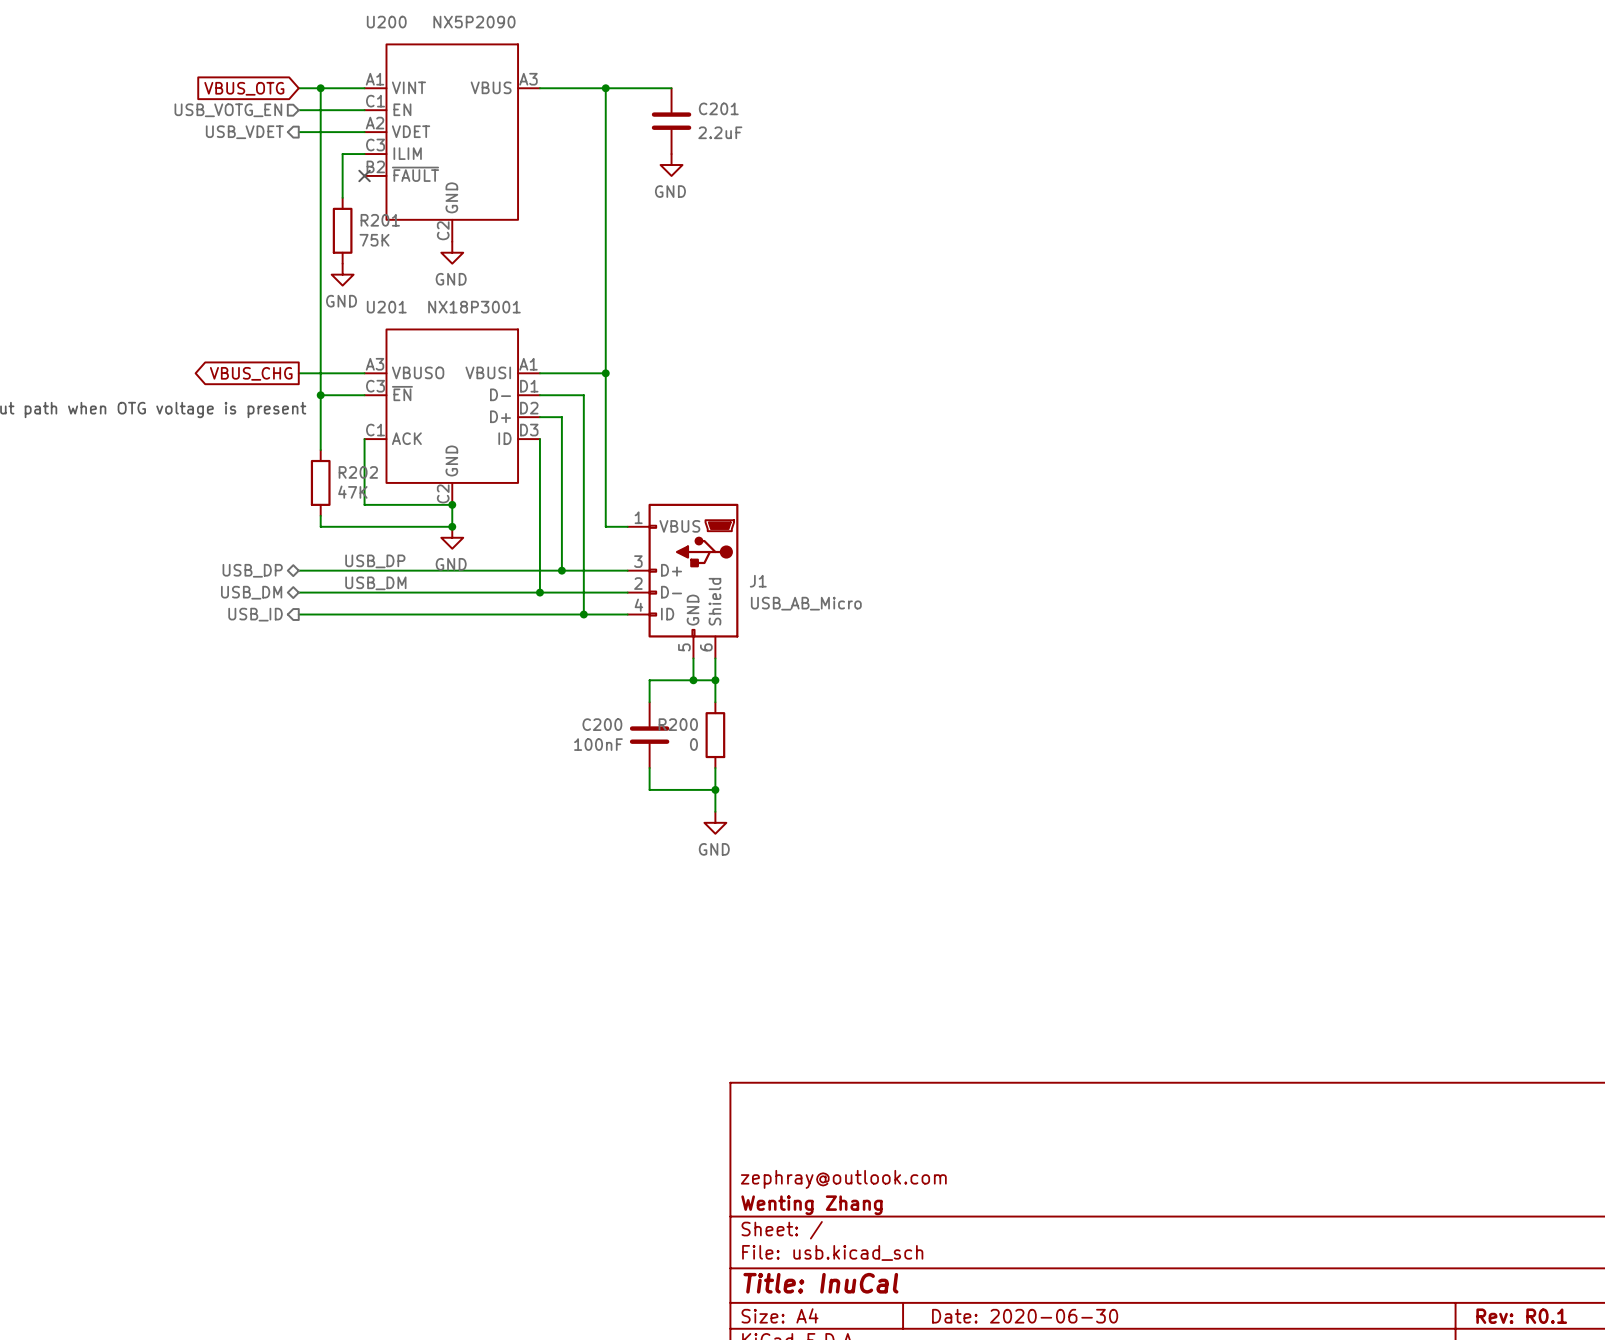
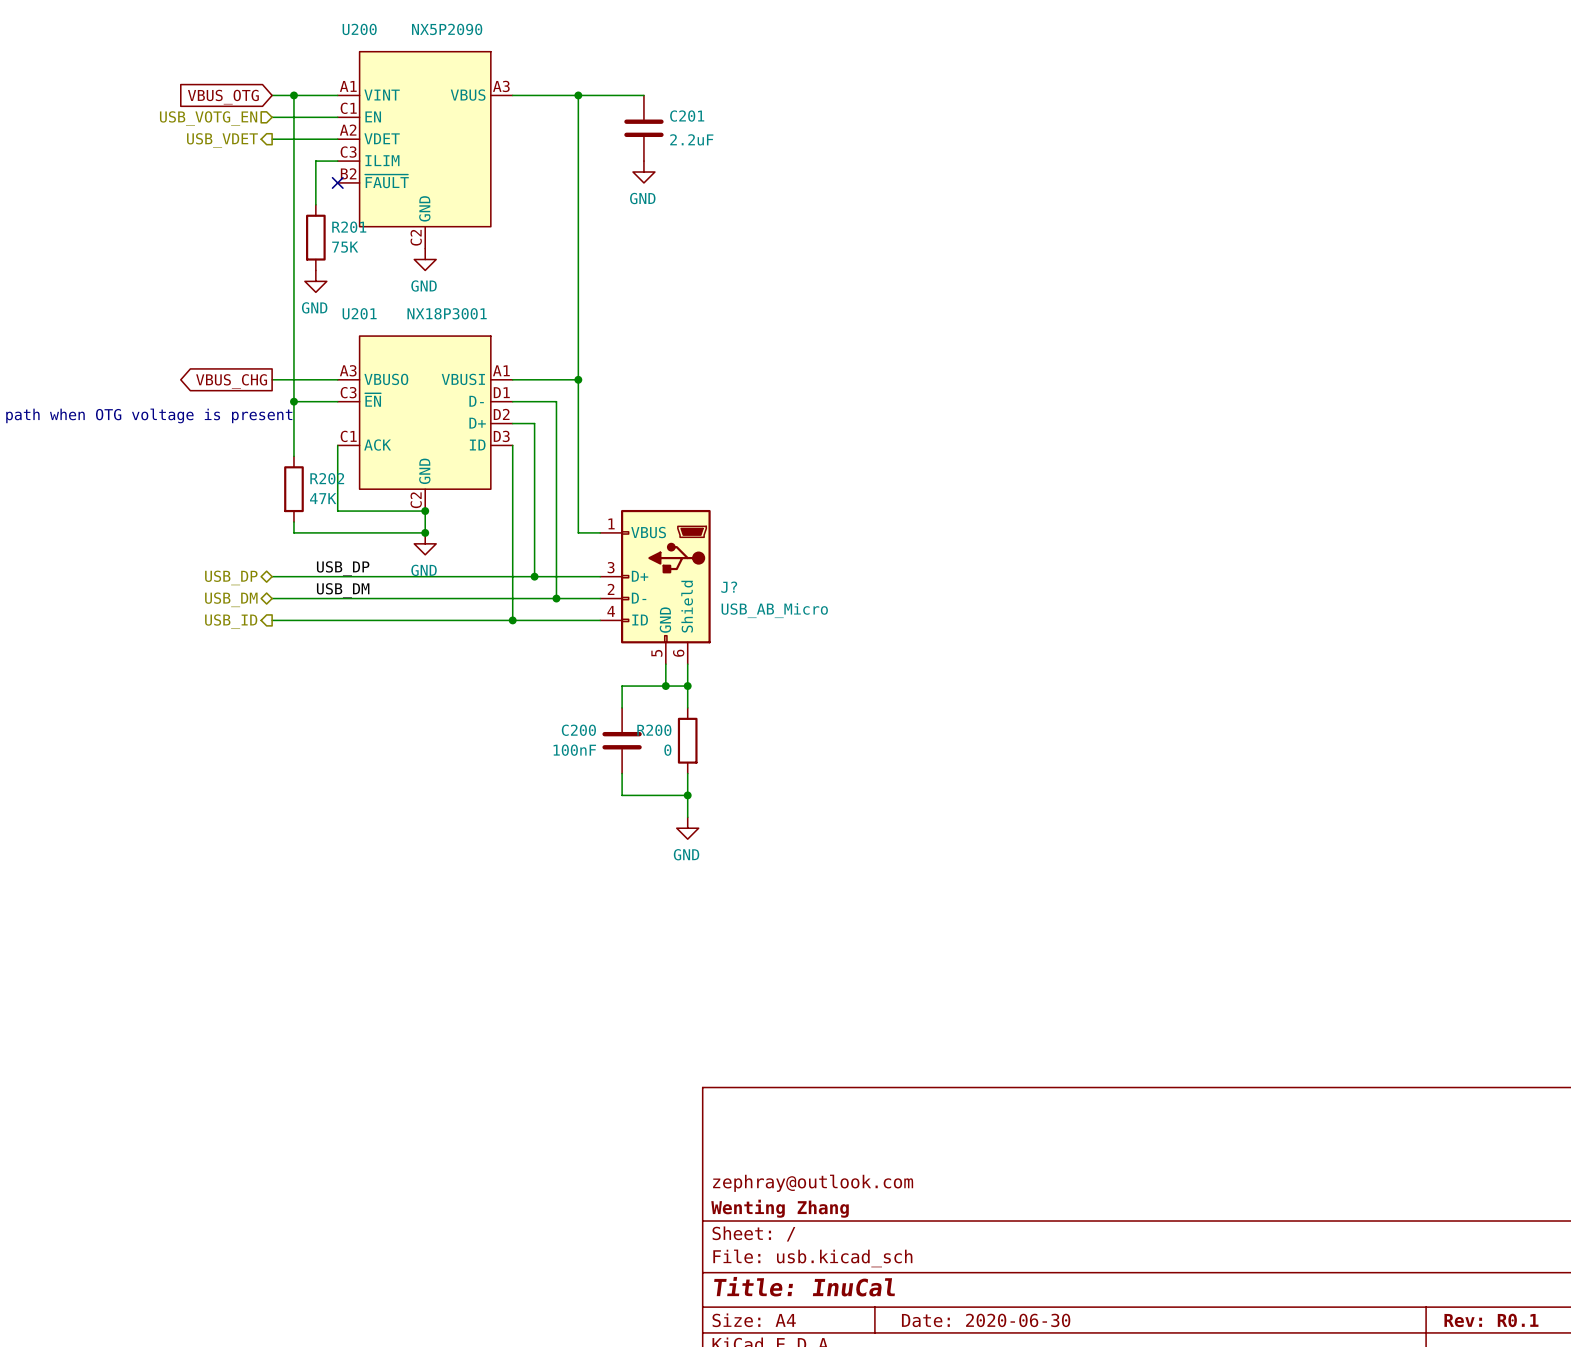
J1 name: J1 (758, 581) -> J? (729, 587)
junction: (539, 592) -> none
wire: (583, 592) (583, 614) -> (512, 598) (512, 620)
junction: none -> (556, 598)
junction: none -> (512, 620)
junction: (583, 614) -> none

